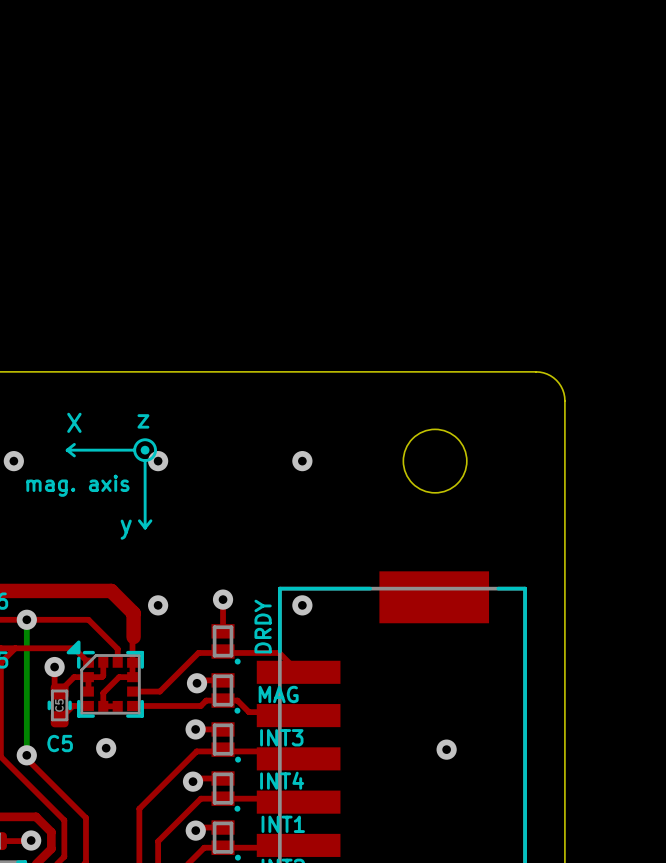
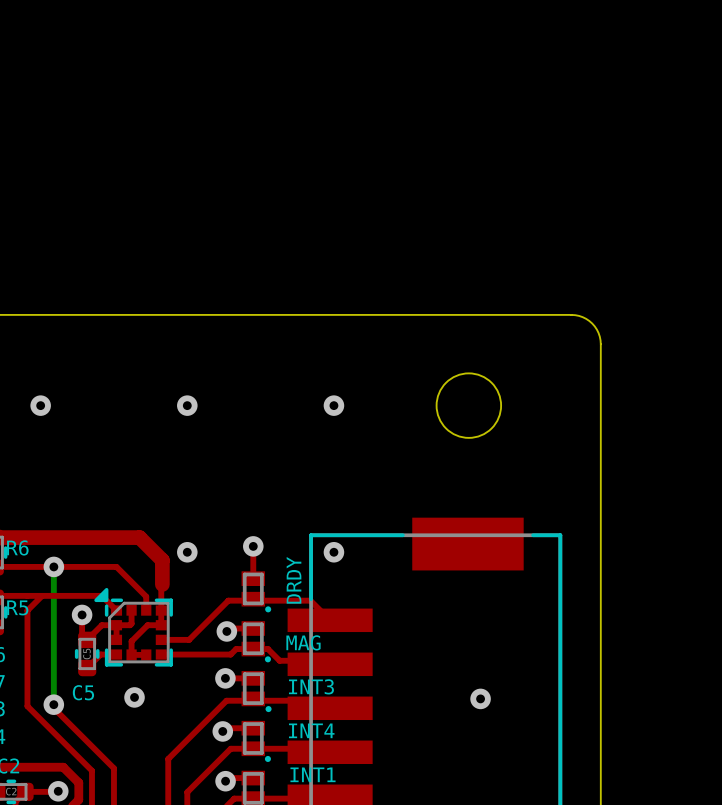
text: z (143, 421) -> none
text: X (74, 422) -> none
drawing: [133, 438, 157, 463] -> none
line: (74, 444) (67, 450) -> none
line: (67, 450) (74, 455) -> none
line: (67, 450) (134, 450) -> none
line: (145, 460) (145, 528) -> none
text: mag. axis (77, 485) -> none
line: (139, 520) (145, 528) -> none
line: (150, 520) (145, 528) -> none
text: y (126, 529) -> none

